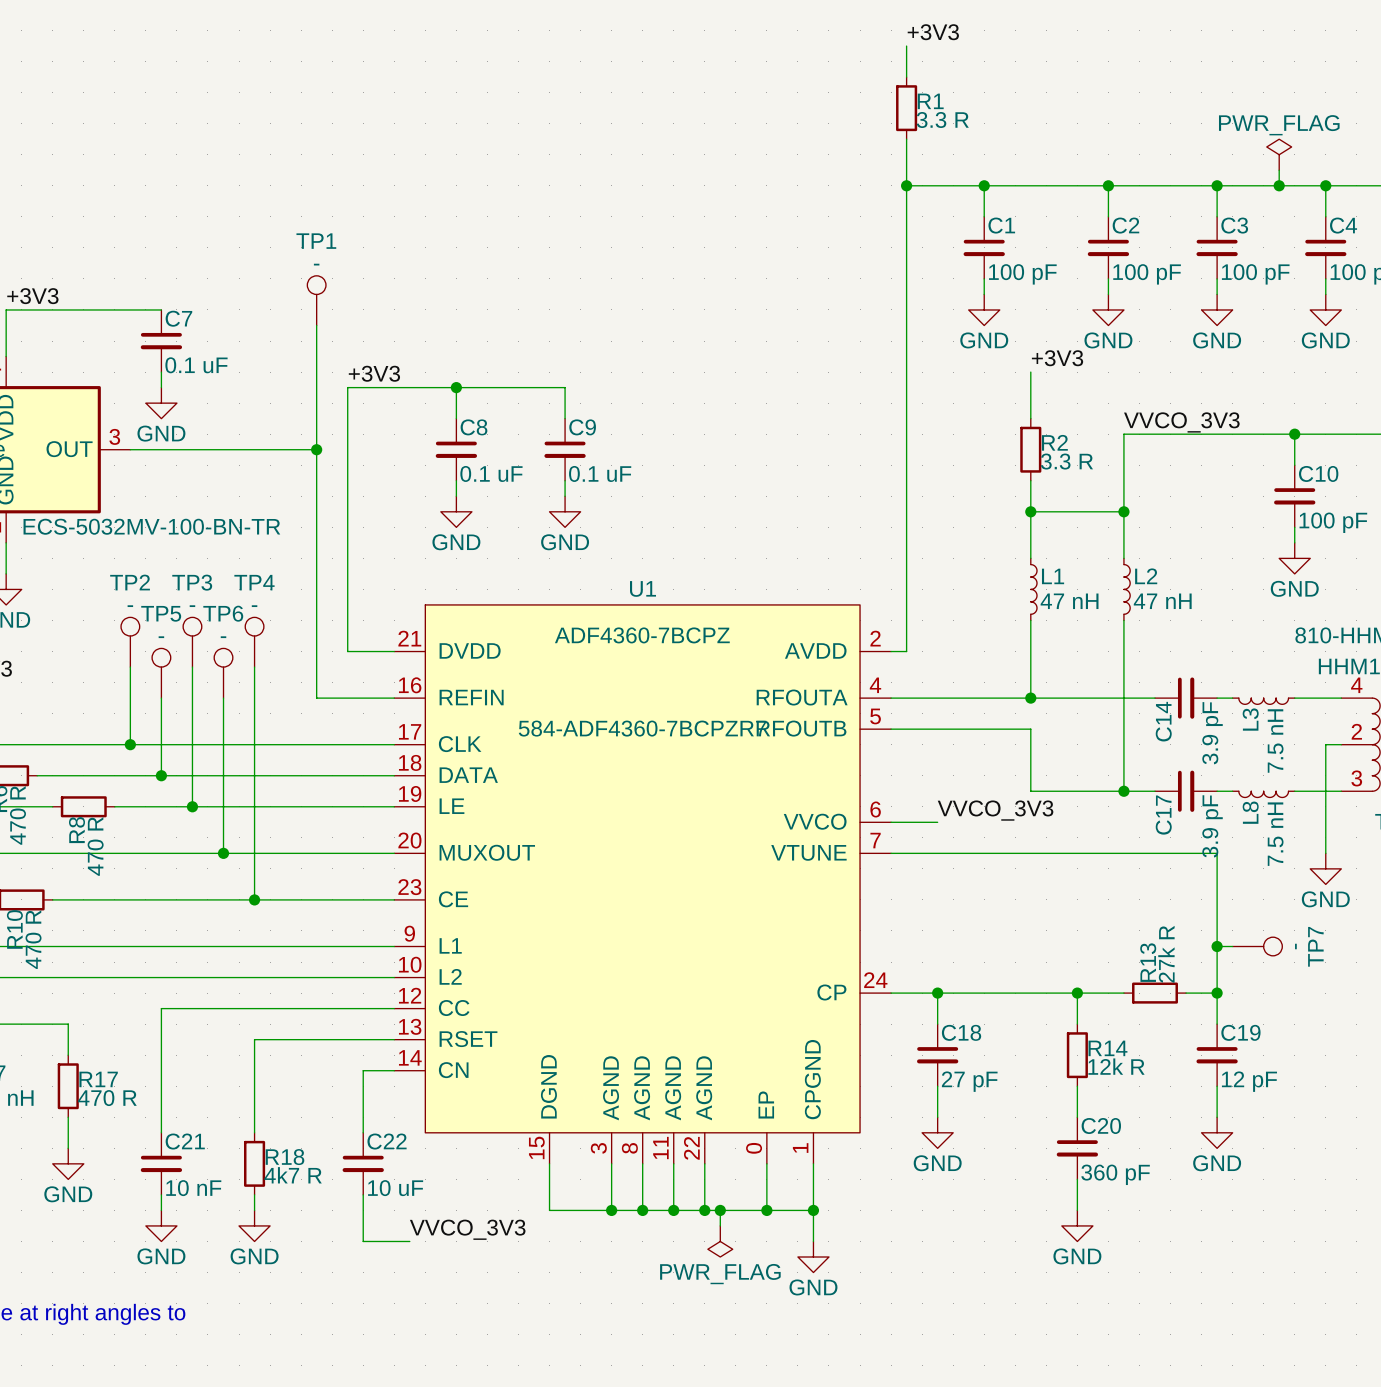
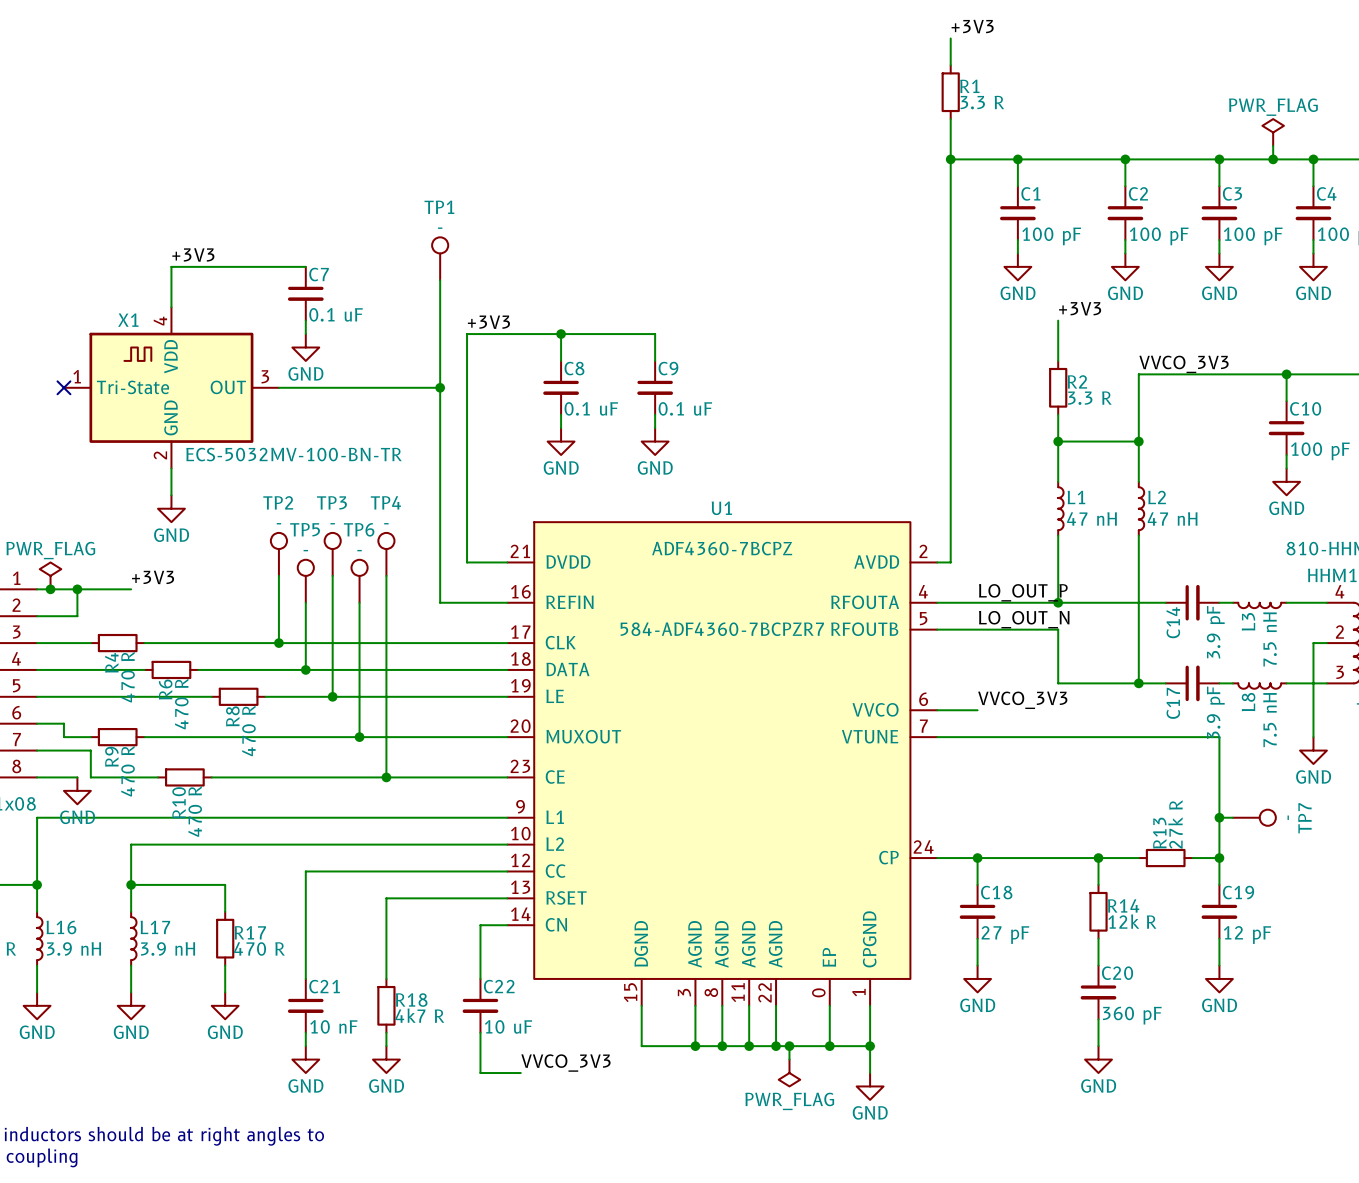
label: none -> LO_OUT_P (1023, 592)
label: none -> LO_OUT_N (1024, 619)

